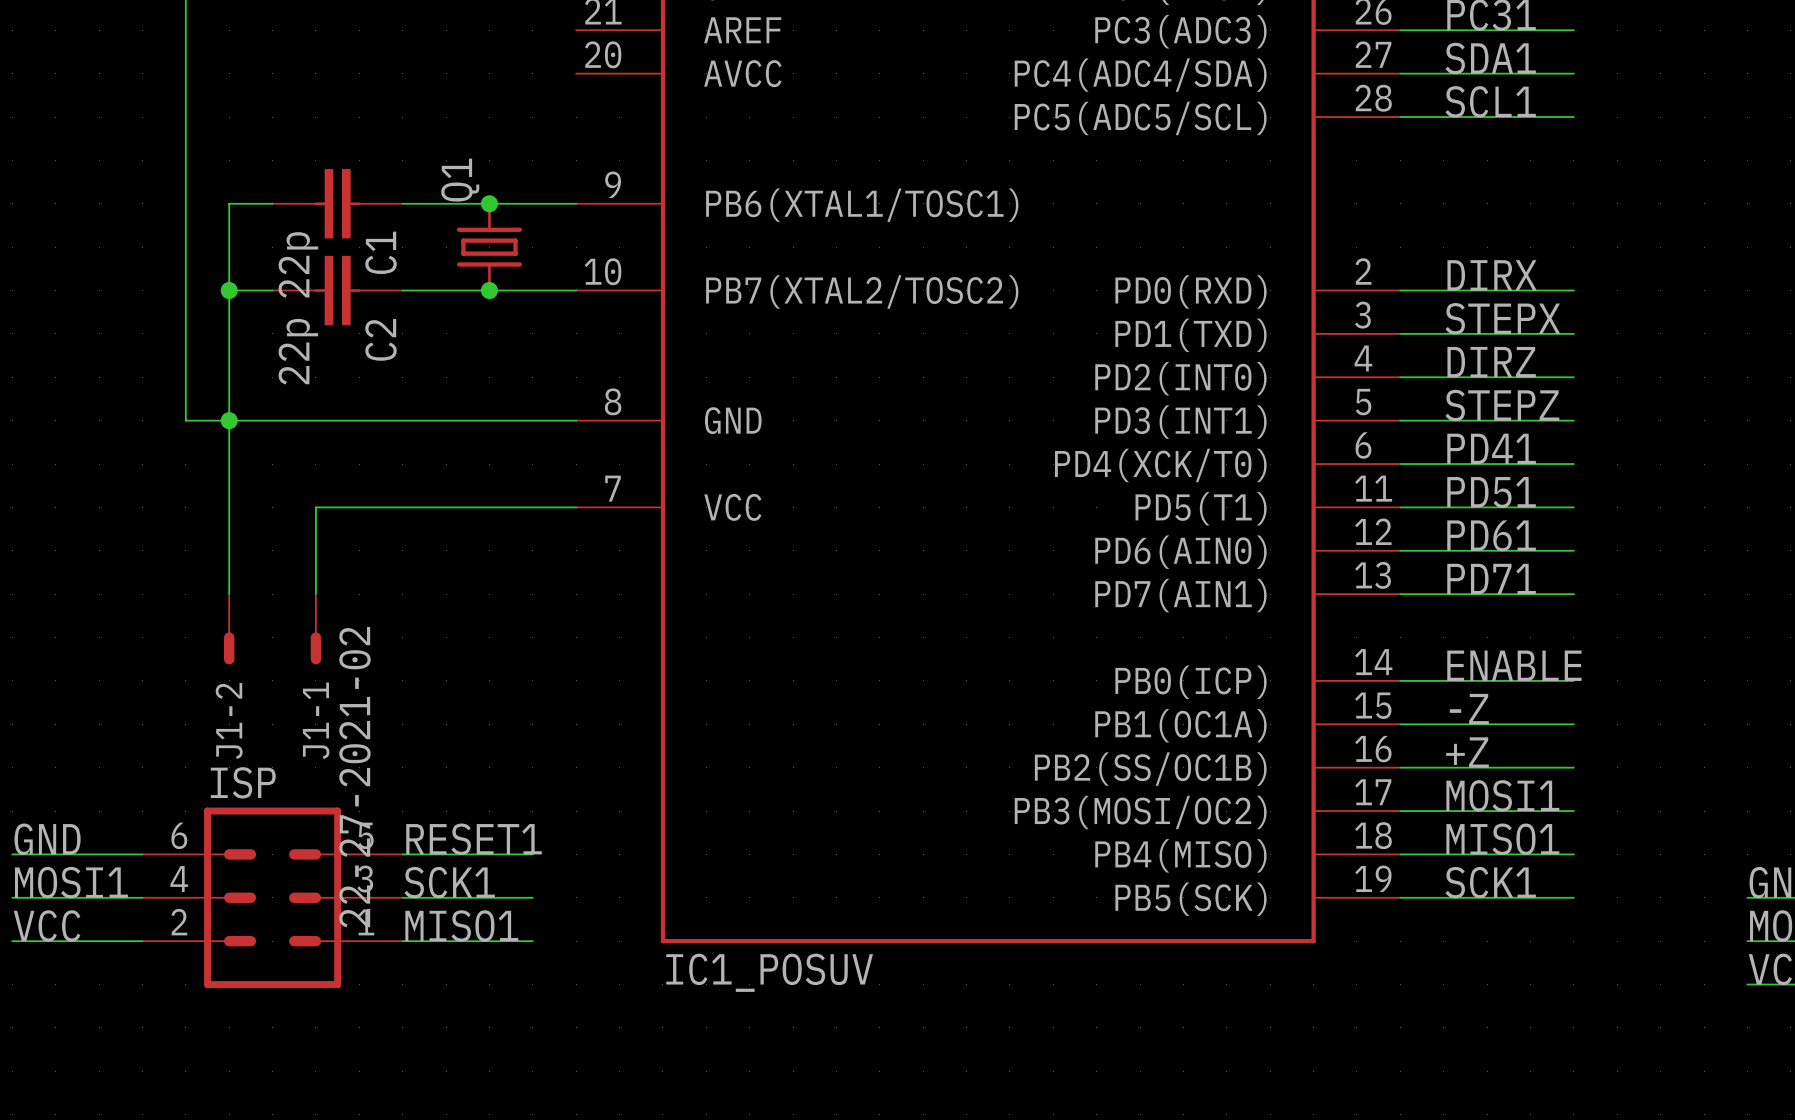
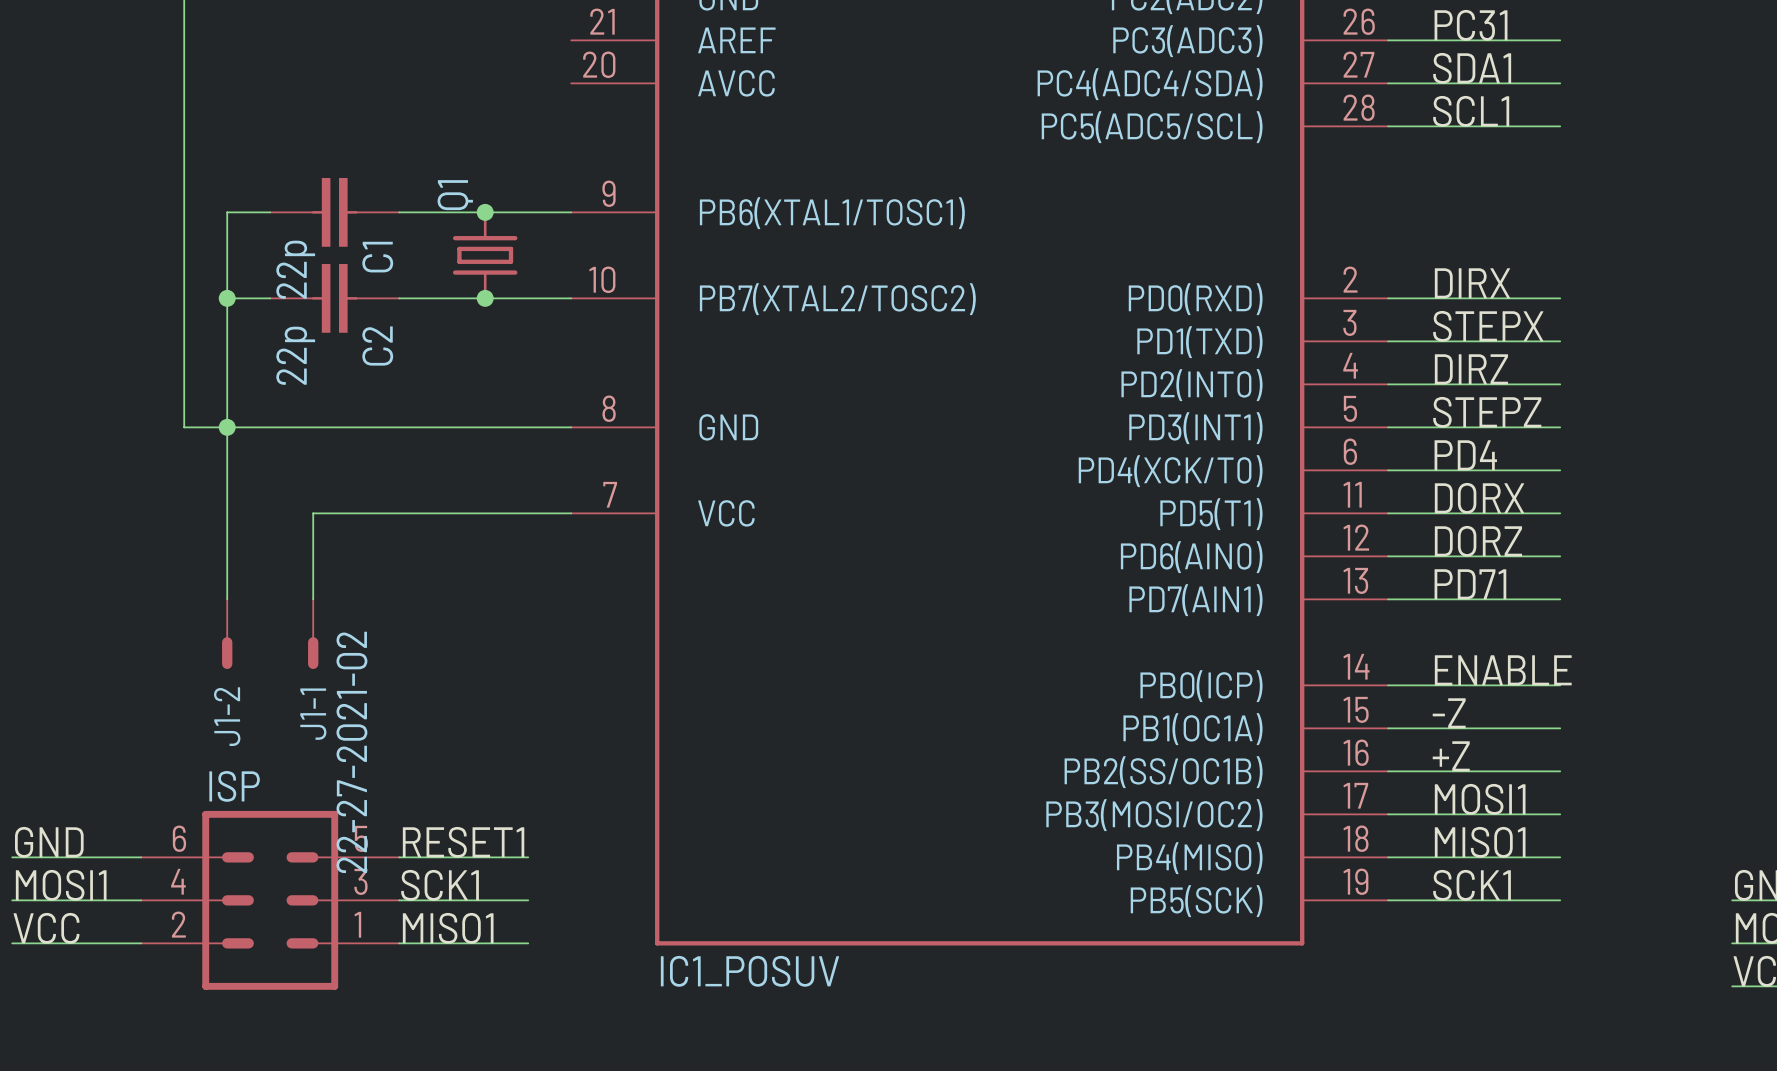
label: PD41 (1491, 448) -> PD4 (1465, 455)
label: PD51 (1491, 492) -> DORX (1479, 498)
label: PD61 (1491, 535) -> DORZ (1478, 541)

